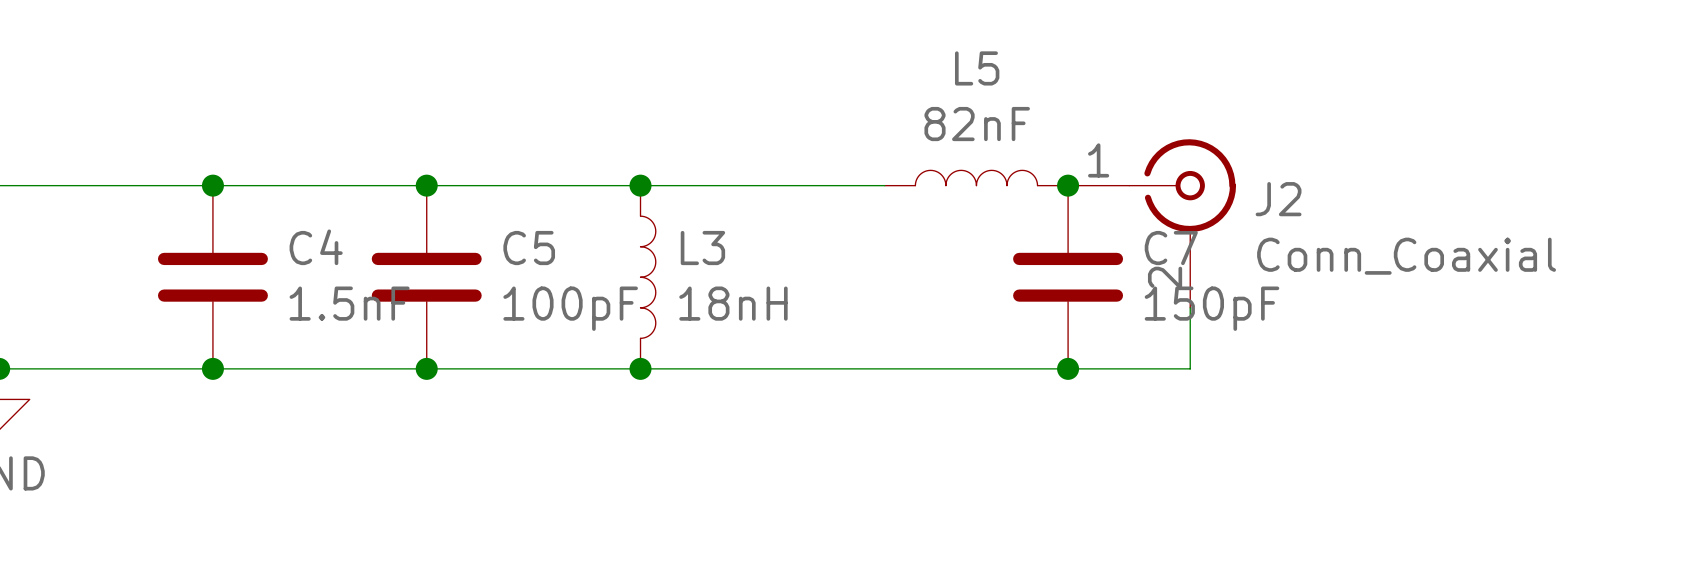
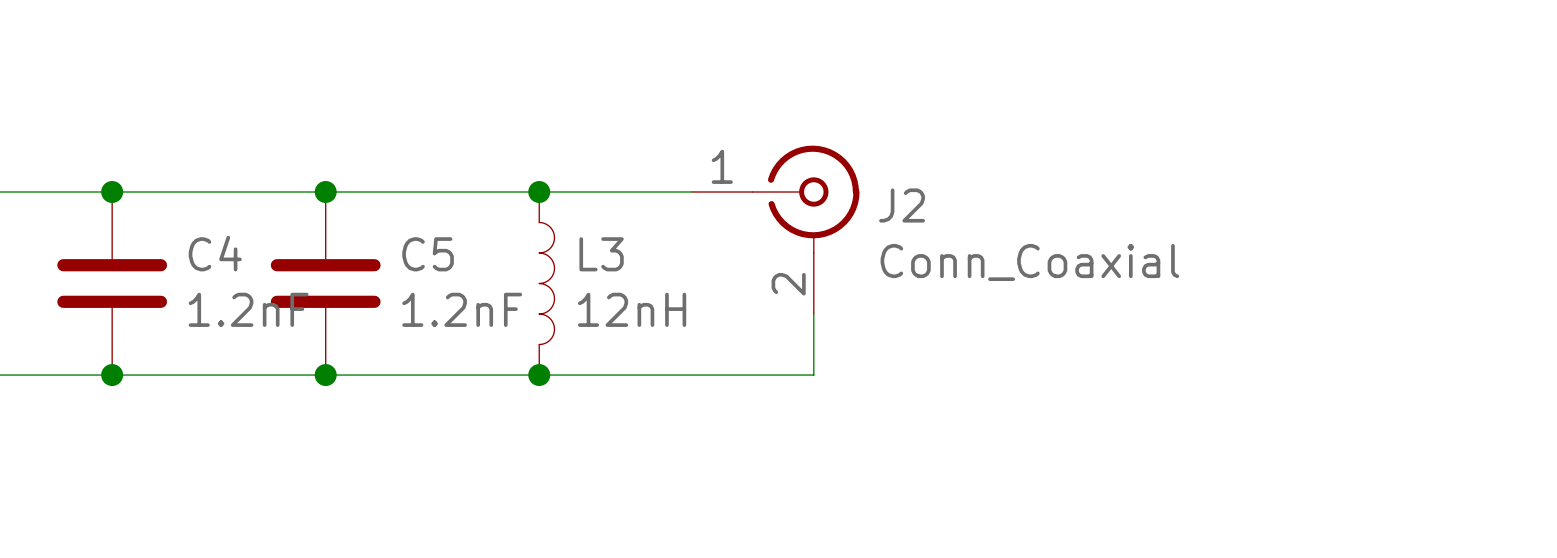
L5: 82nF (976, 178) -> none
junction: (1068, 185) -> none
J2 position: (1152, 223) -> (775, 229)
C7: 150pF (1068, 277) -> none
C4 value: 1.5nF (349, 303) -> 1.2nF (248, 309)
L3 value: 18nH (733, 303) -> 12nH (632, 309)
wire: (1190, 307) (1190, 368) (915, 368) -> (813, 314) (813, 375)
C5 value: 100pF (570, 308) -> 1.2nF (462, 309)
junction: (1068, 368) -> none

